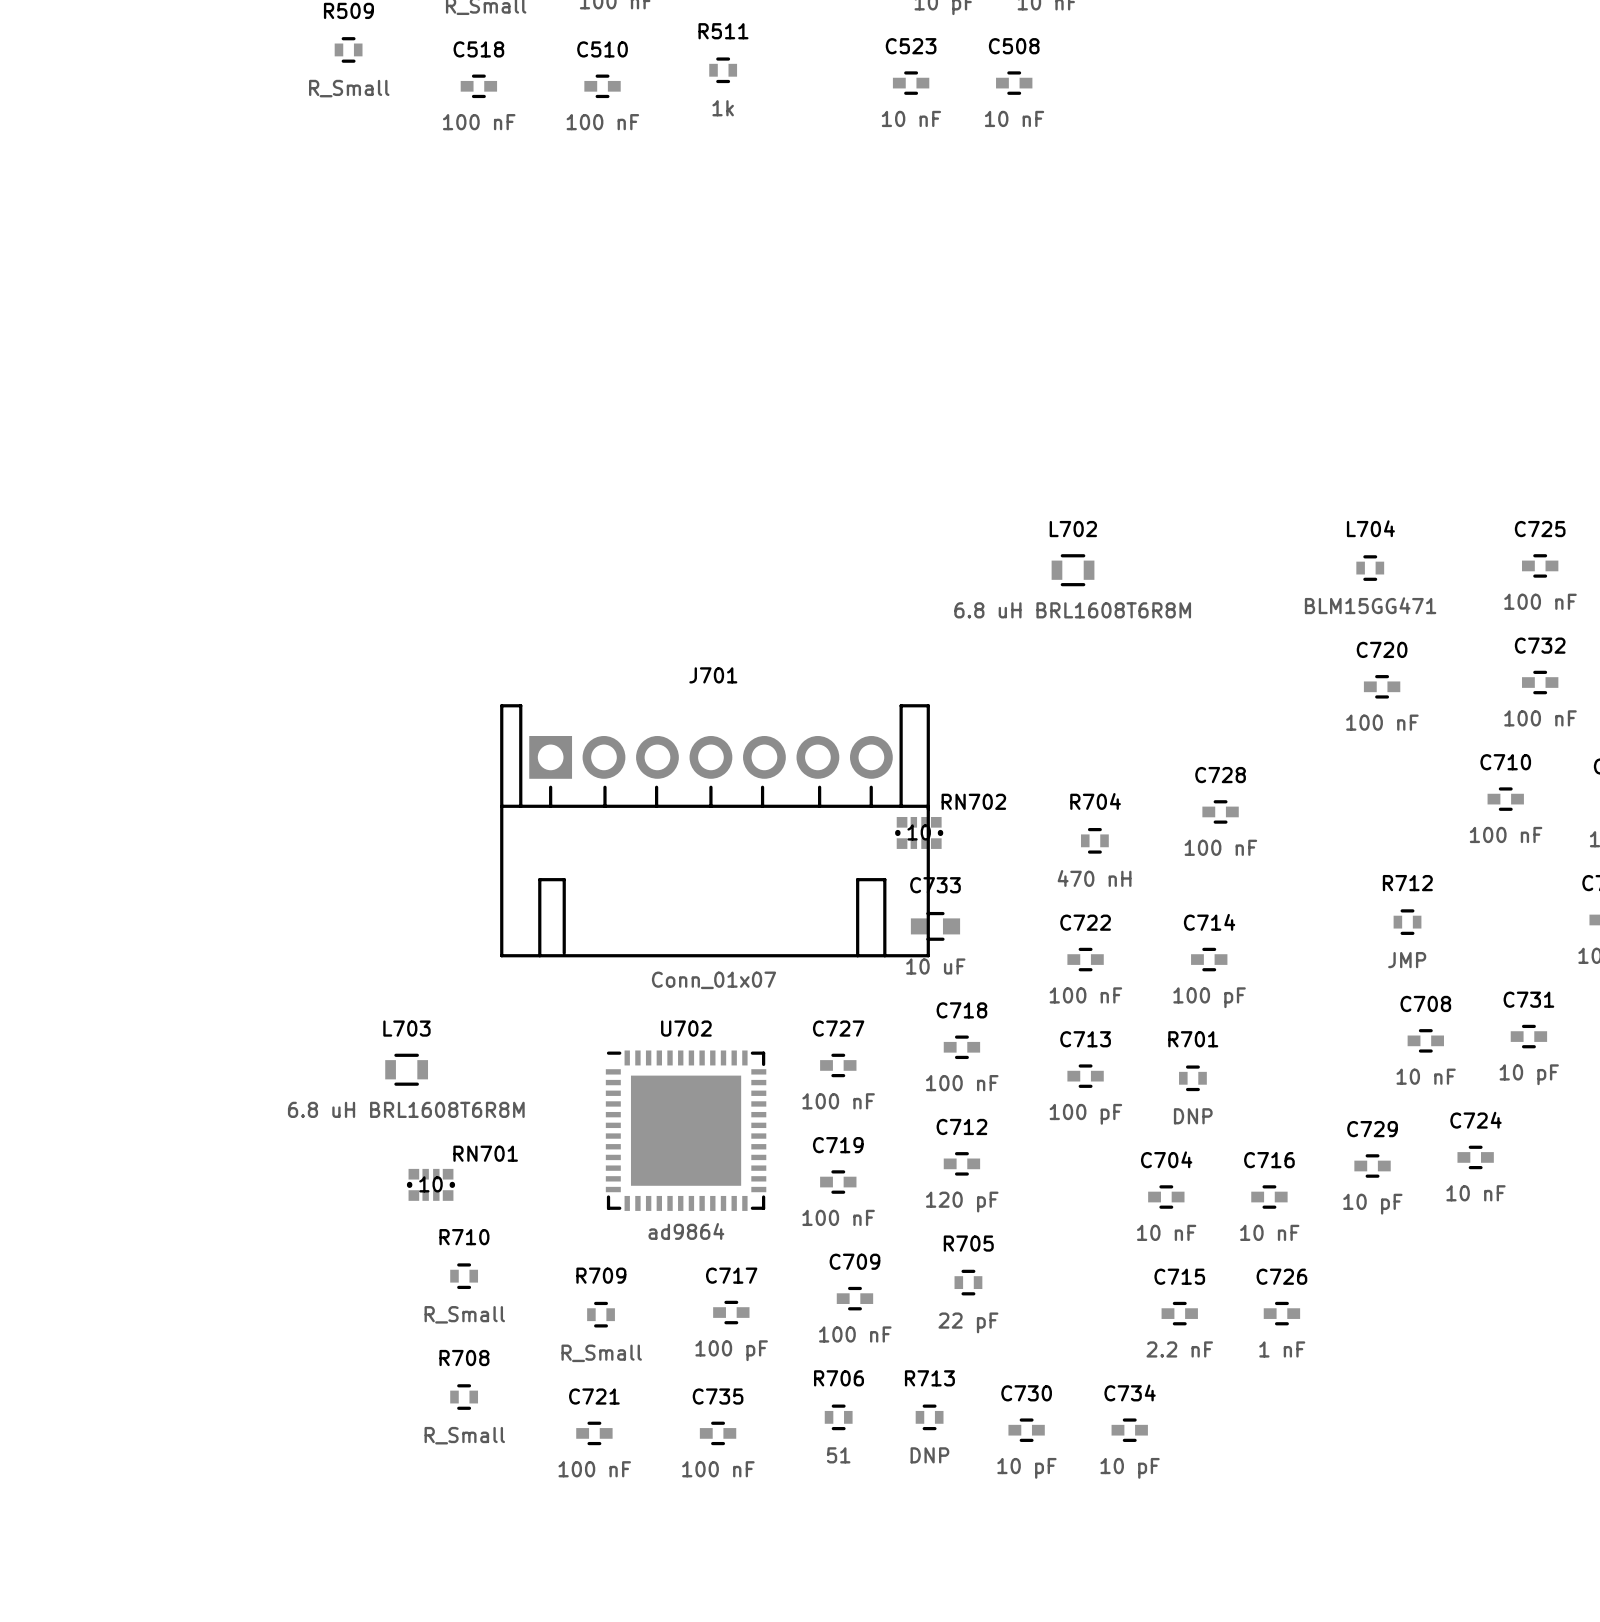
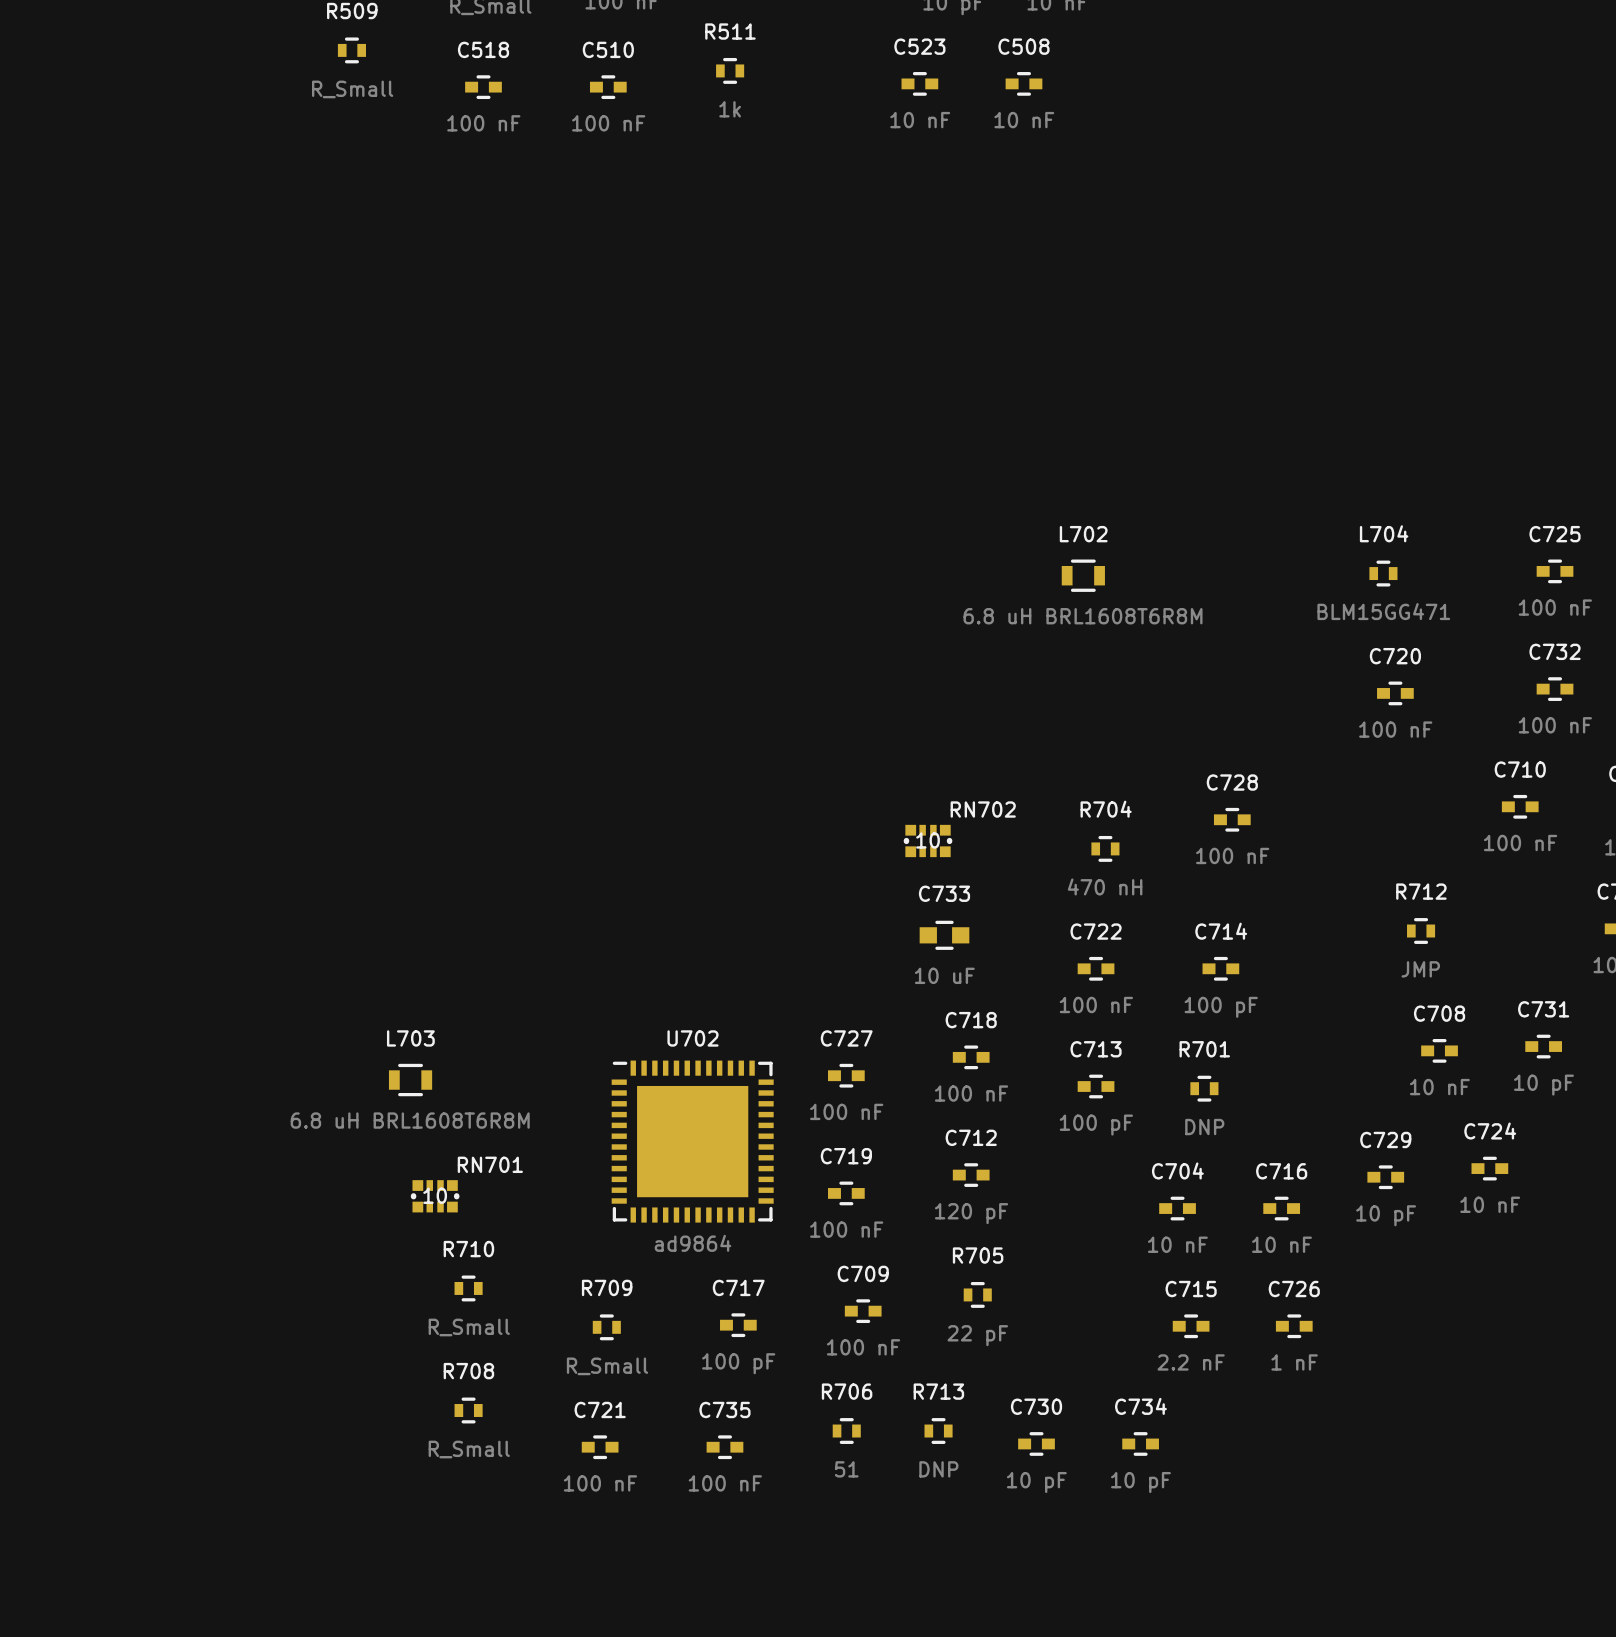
J701: Conn_01x07 (715, 830) -> none

